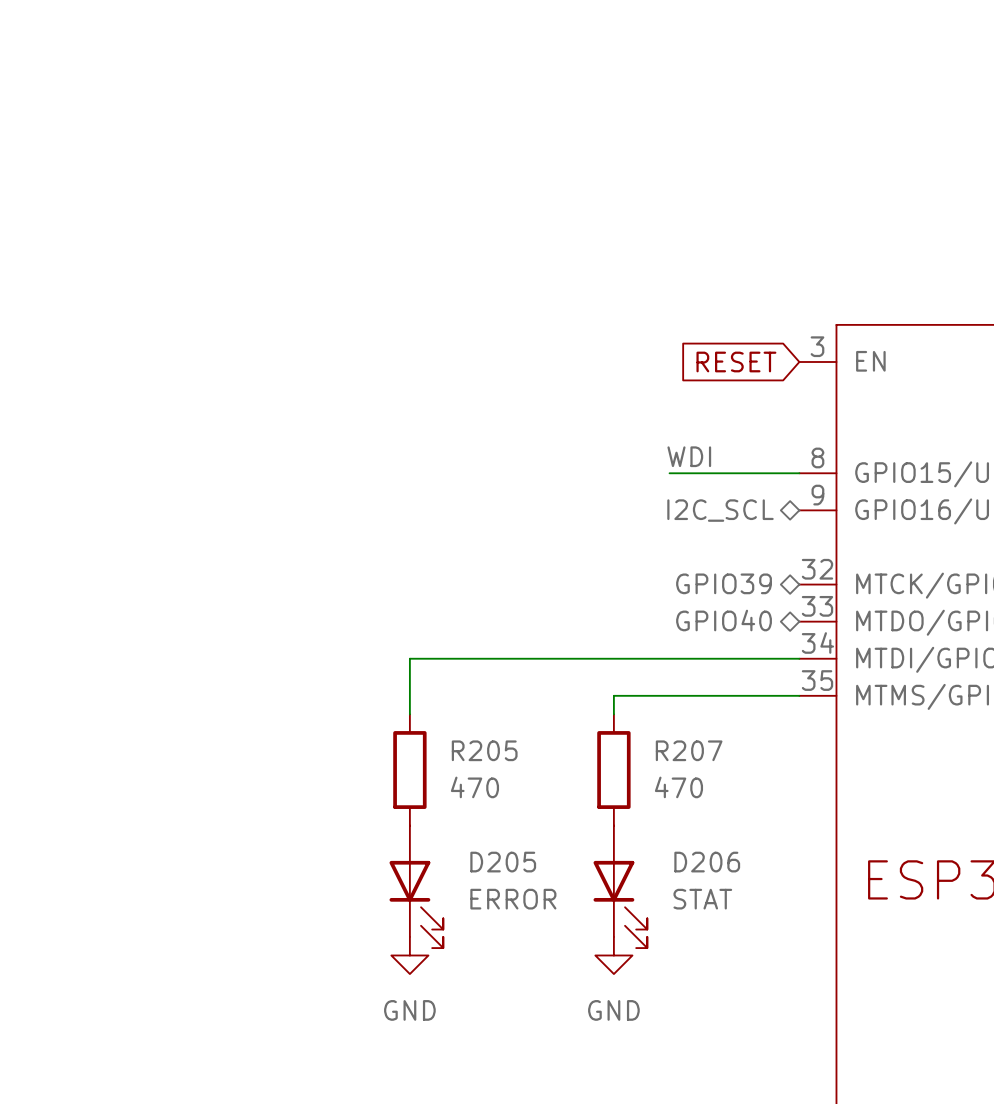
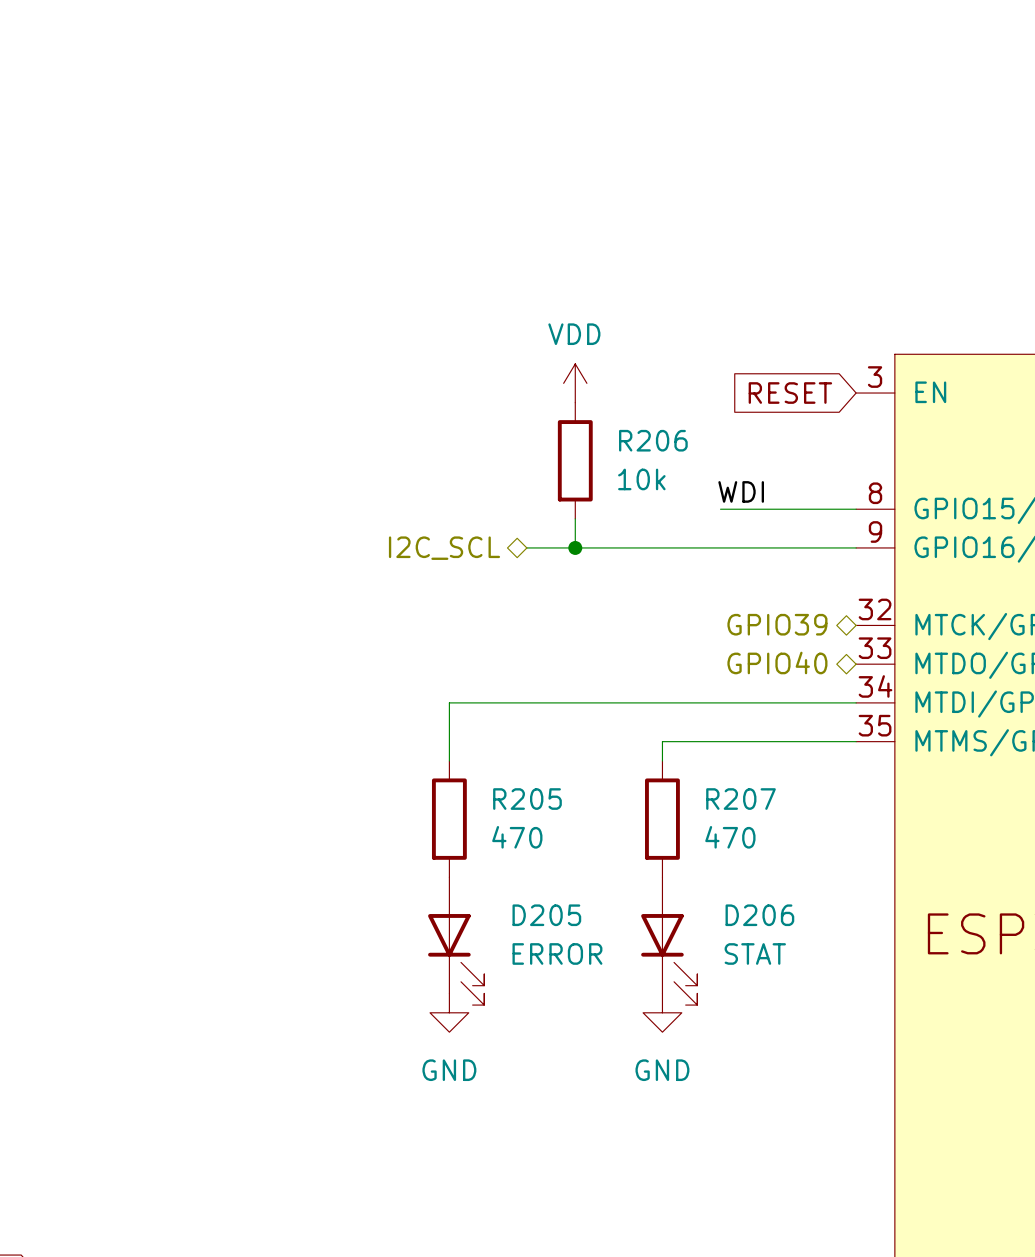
power symbol: none -> VDD (575, 383)
R206: none -> 10k (575, 460)
wire: none -> (575, 518) (575, 547)
wire: none -> (526, 547) (856, 547)
junction: none -> (575, 547)
hierarchical label position: I2C_SCL (720, 510) -> I2C_SCL (444, 548)

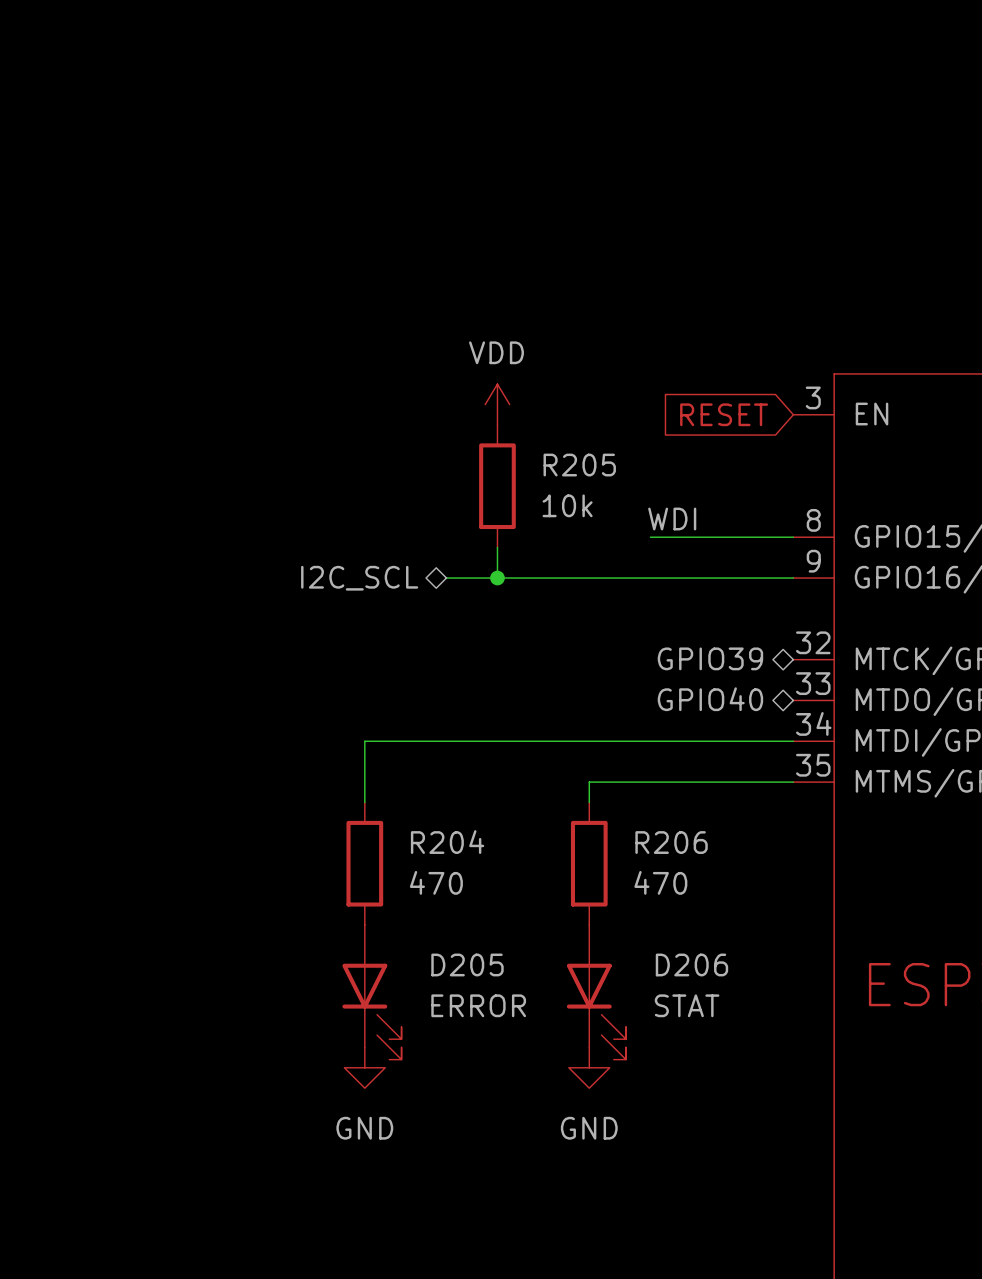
R206 name: R206 (653, 440) -> R205 (579, 465)
R205 name: R205 (527, 799) -> R204 (447, 842)
R207 name: R207 (740, 799) -> R206 (671, 842)

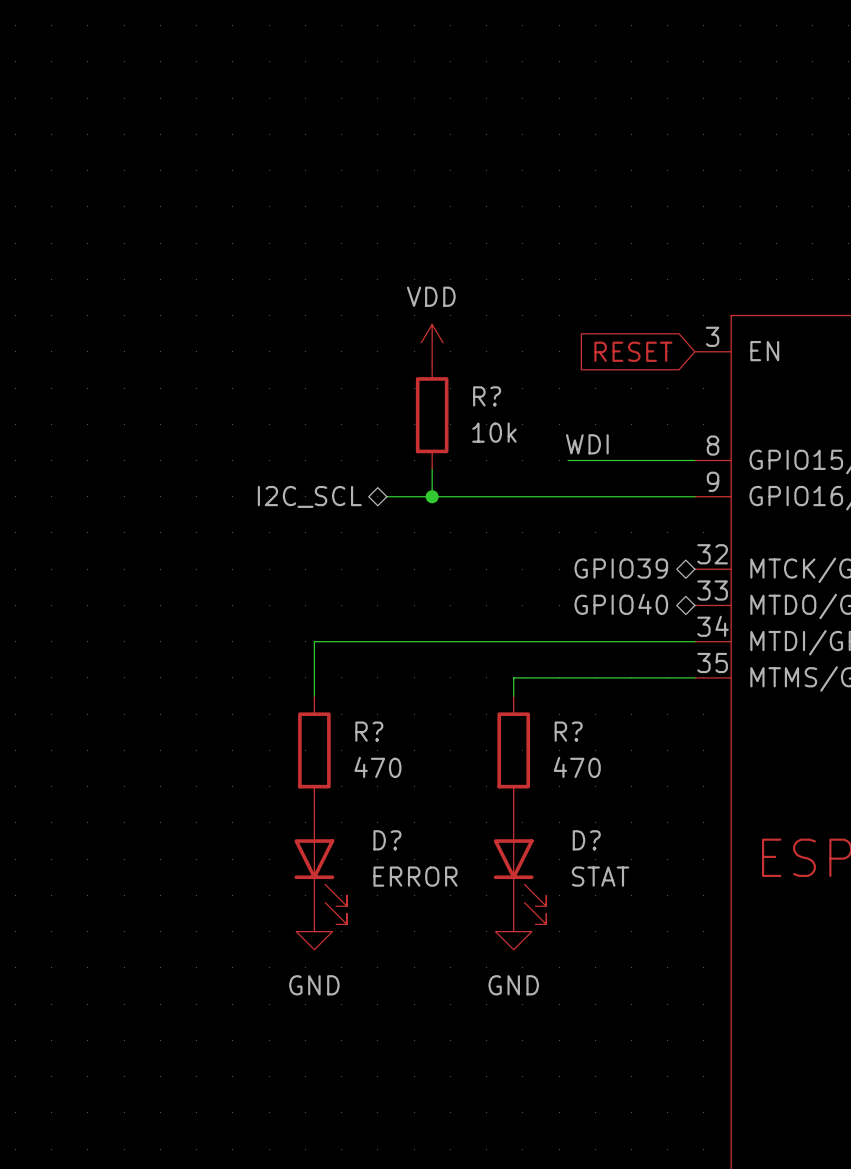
R205 name: R205 (579, 465) -> R? (487, 396)
R204 name: R204 (447, 842) -> R? (369, 731)
R206 name: R206 (671, 842) -> R? (568, 731)
D205 name: D205 (467, 964) -> D? (387, 840)
D206 name: D206 (691, 964) -> D? (586, 840)

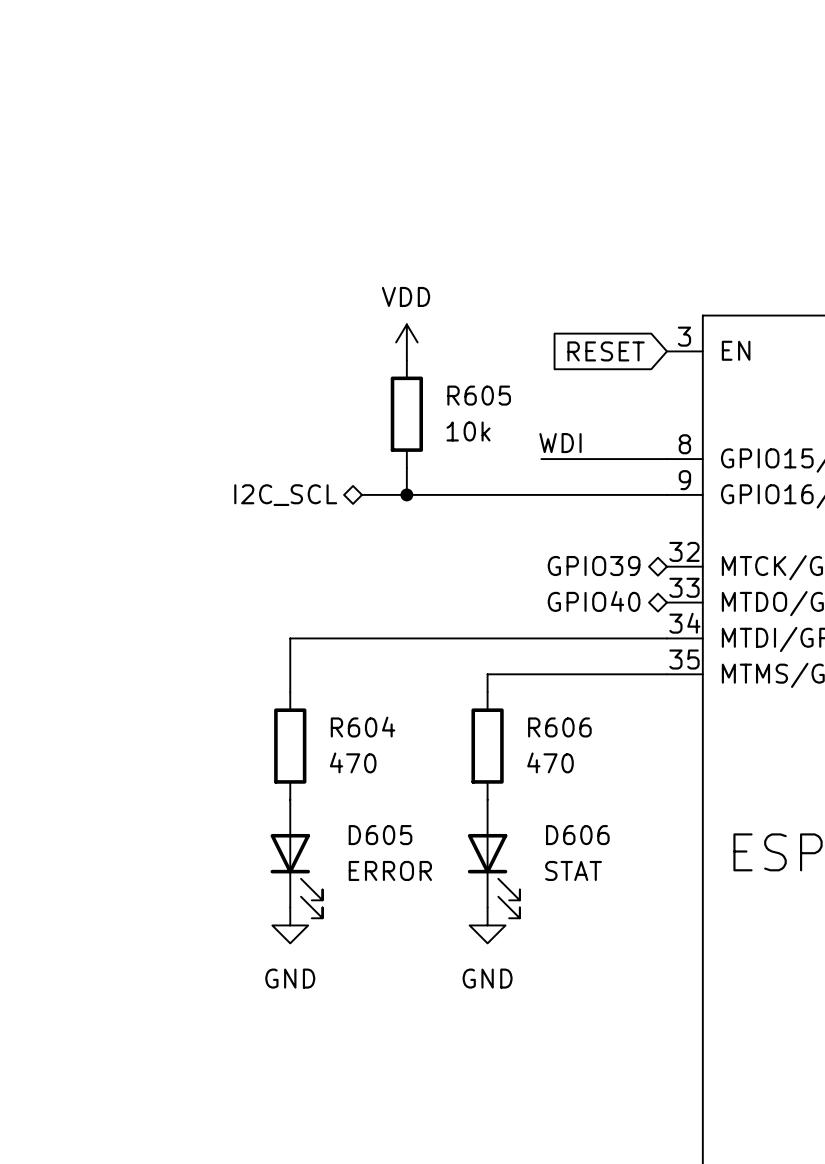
R? name: R? (487, 396) -> R605 (479, 395)
R? name: R? (369, 731) -> R604 (363, 727)
R? name: R? (568, 731) -> R606 (559, 727)
D? name: D? (387, 840) -> D605 (380, 835)
D? name: D? (586, 840) -> D606 (577, 835)

